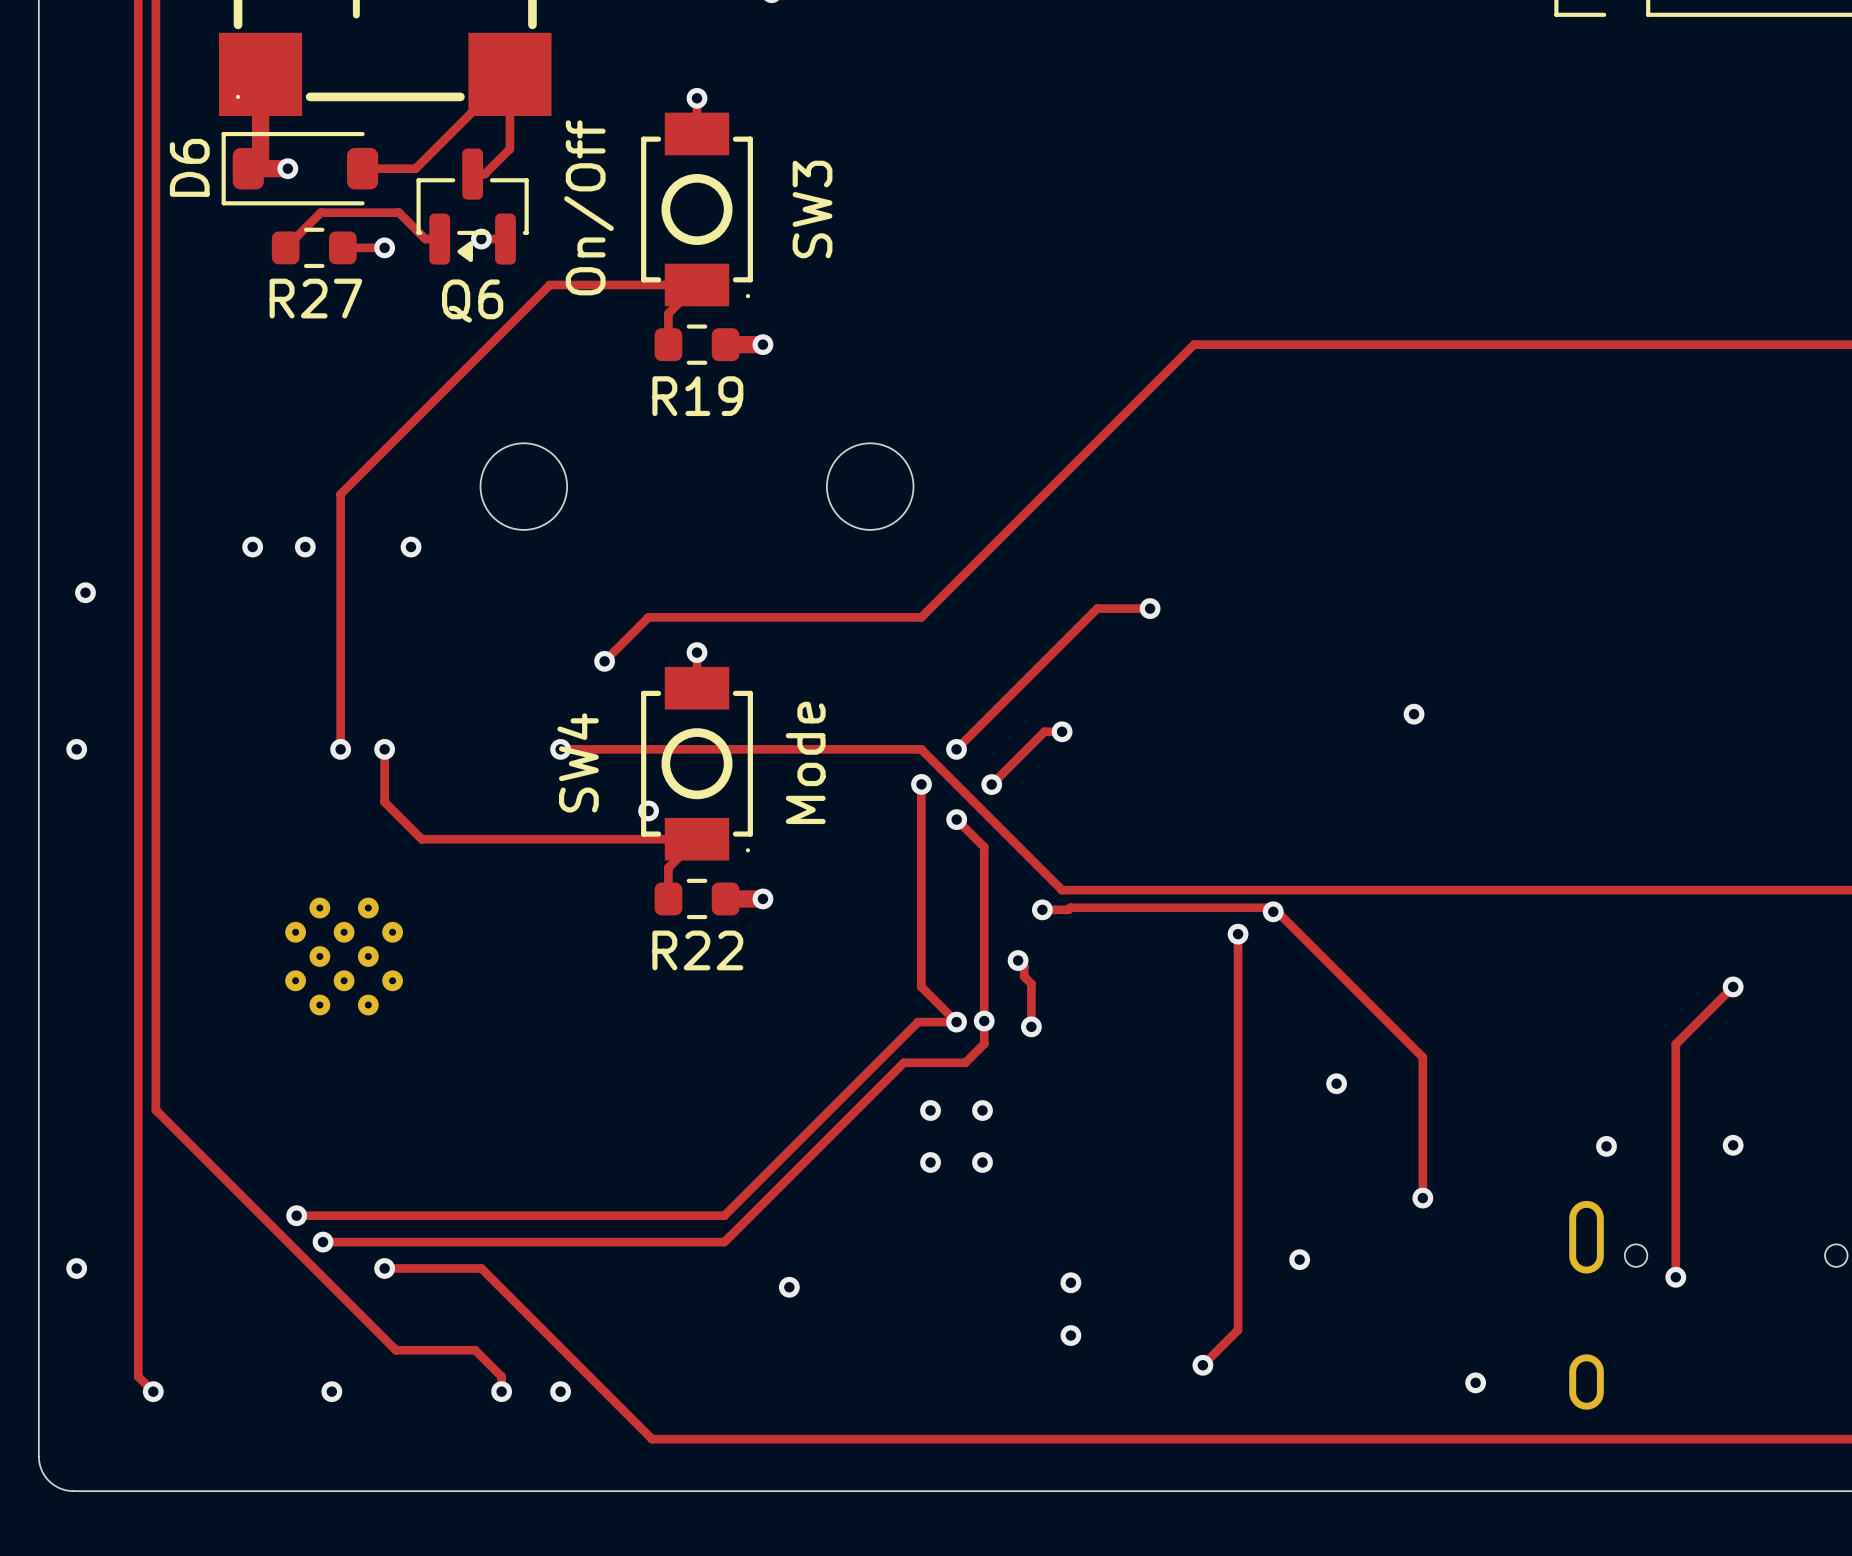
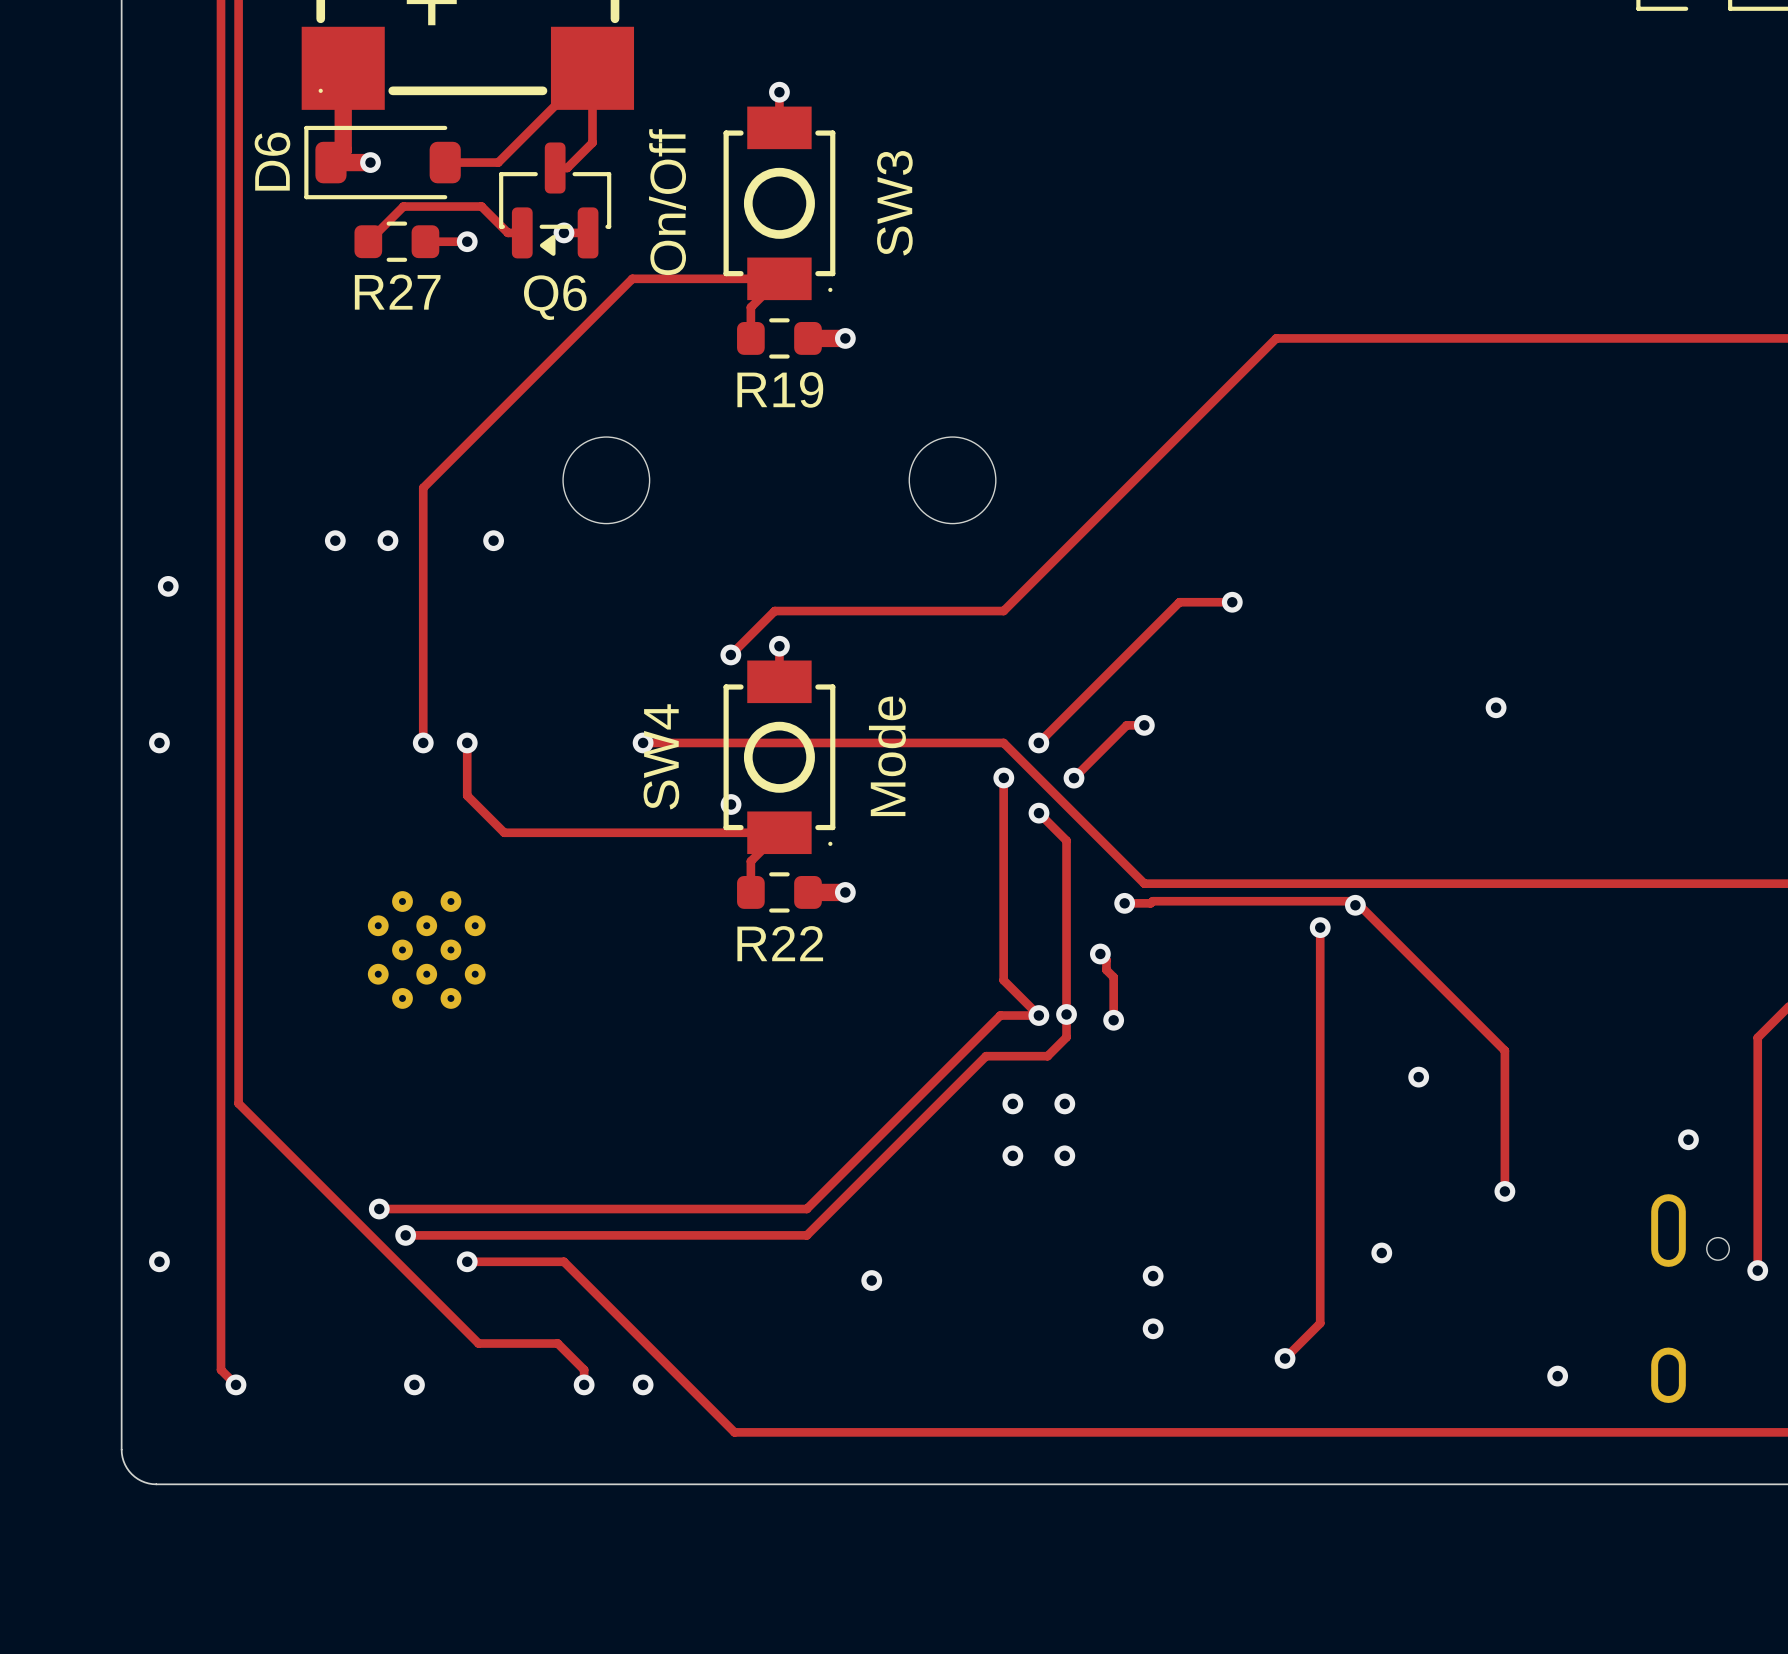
track: (692, 617) (648, 617) (604, 661) -> (774, 611) (730, 654)
via position: (604, 661) -> (730, 654)

